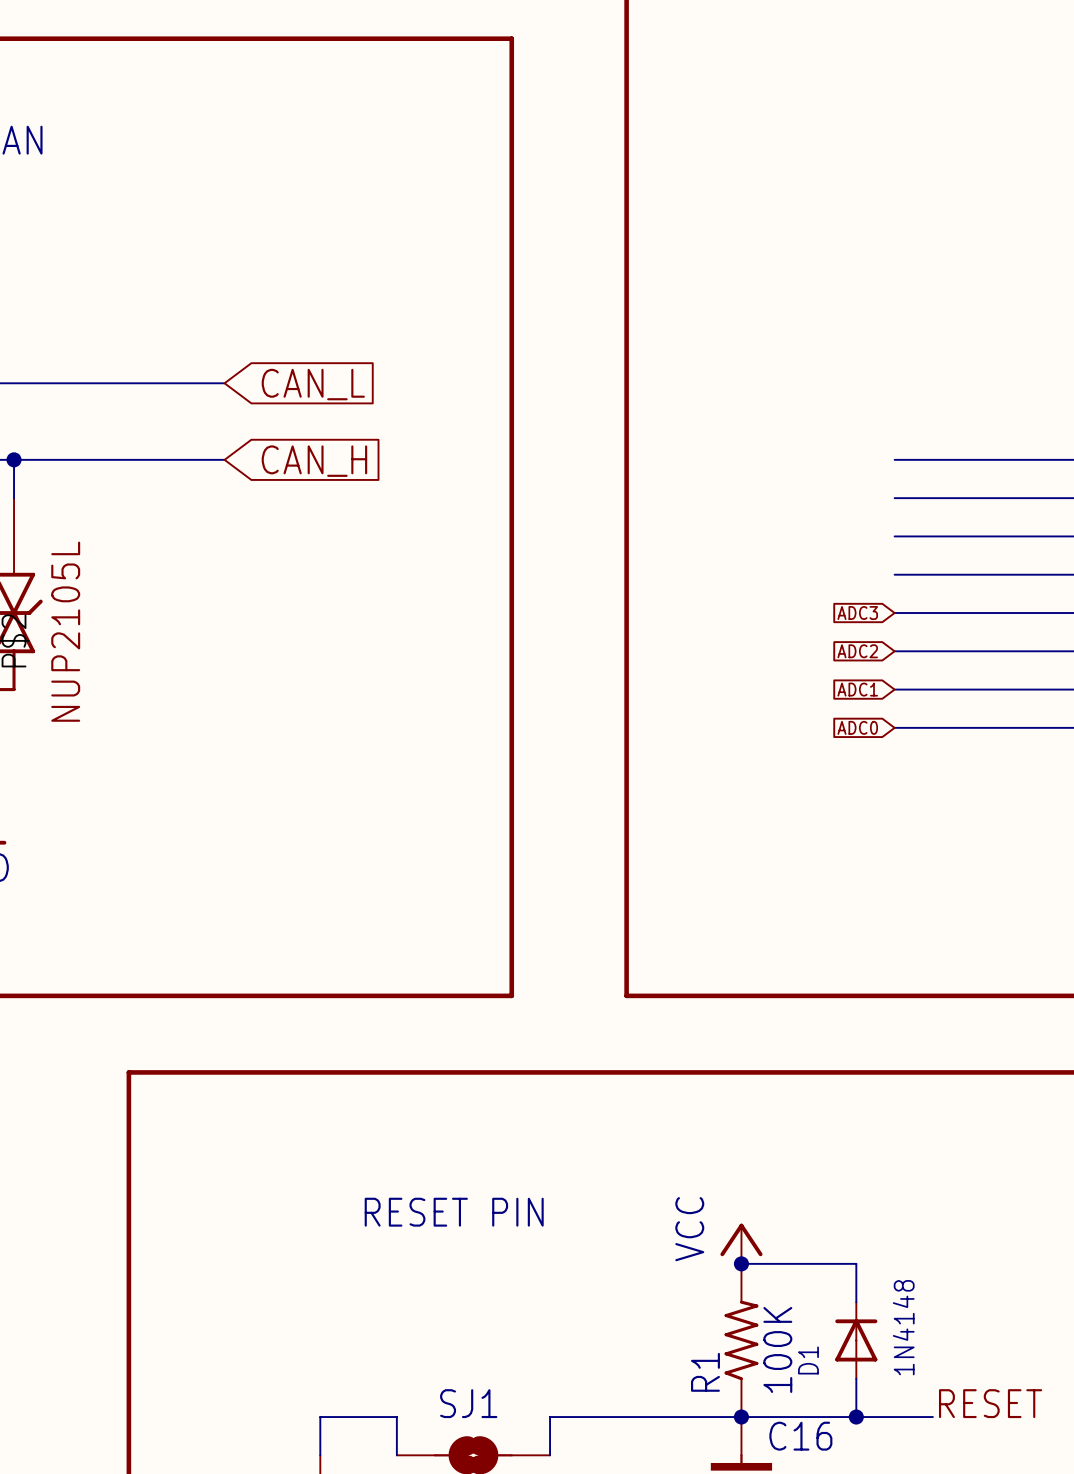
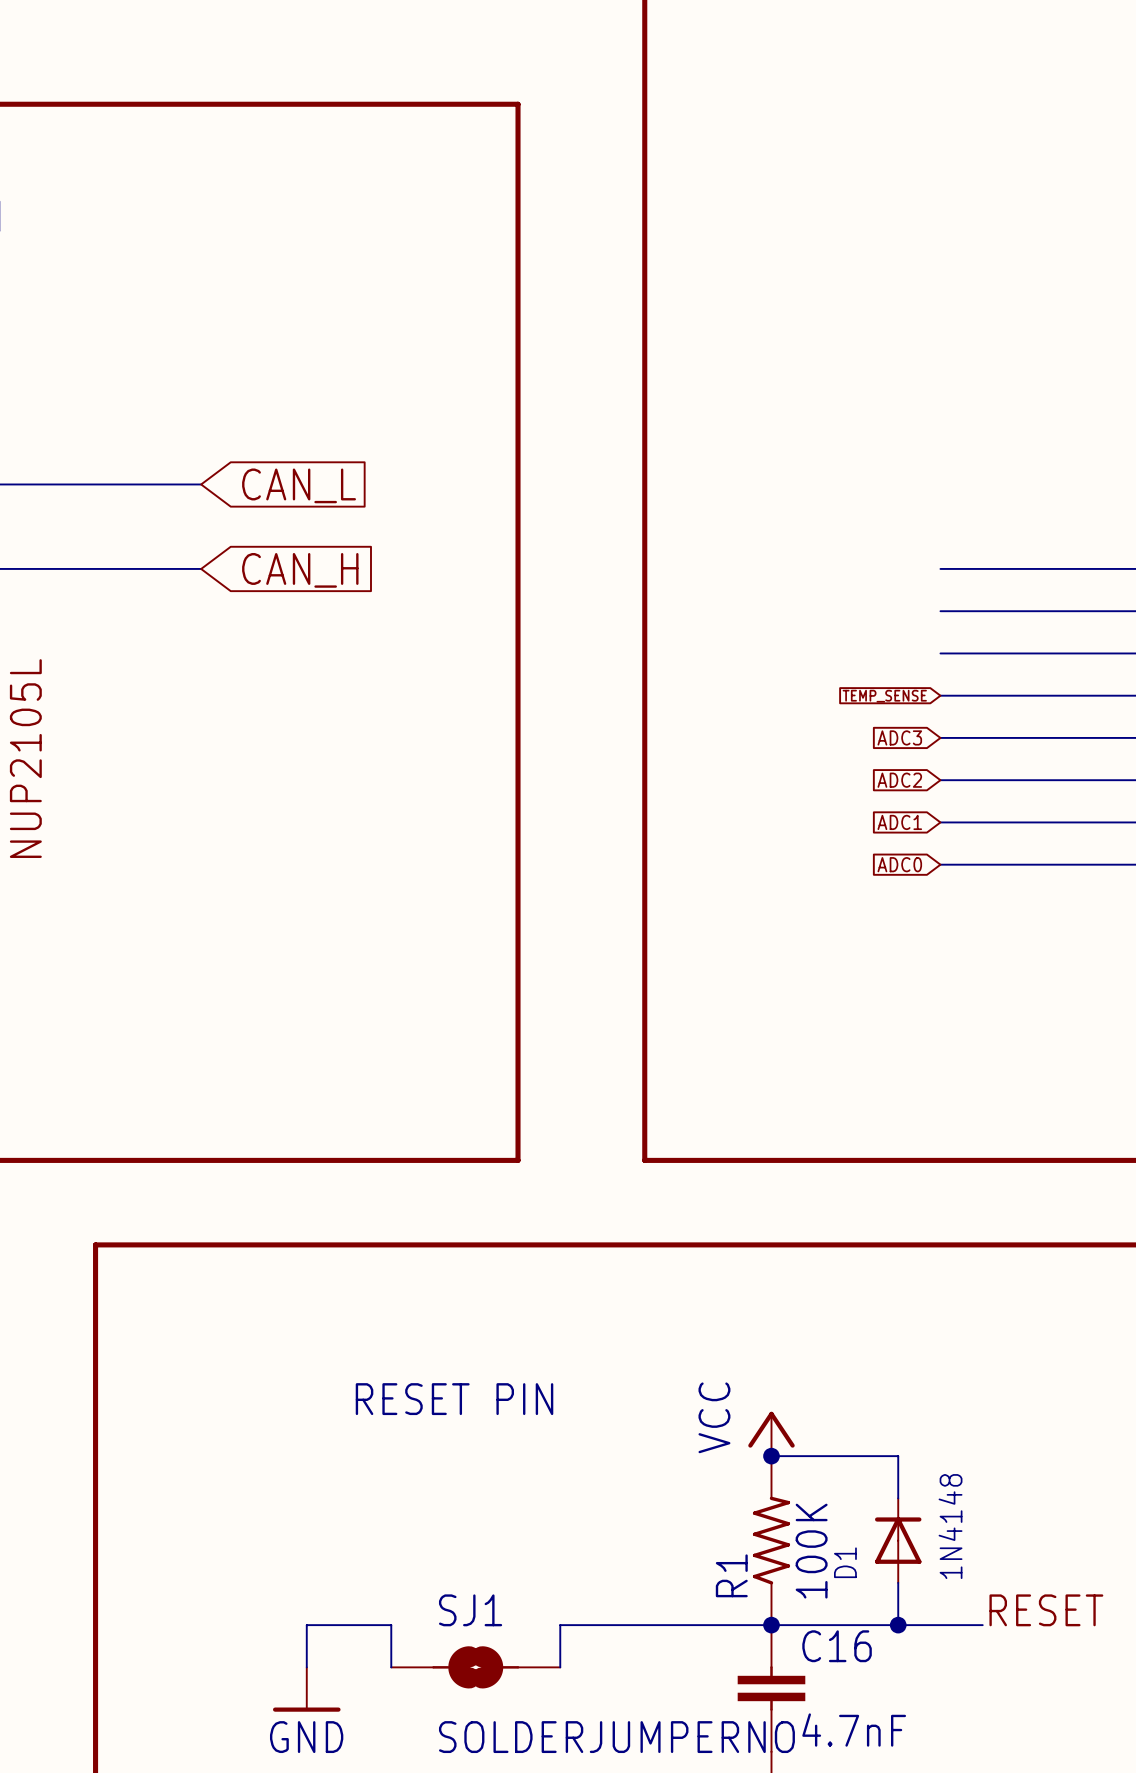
global label: none -> TEMP_SENSE (884, 696)

